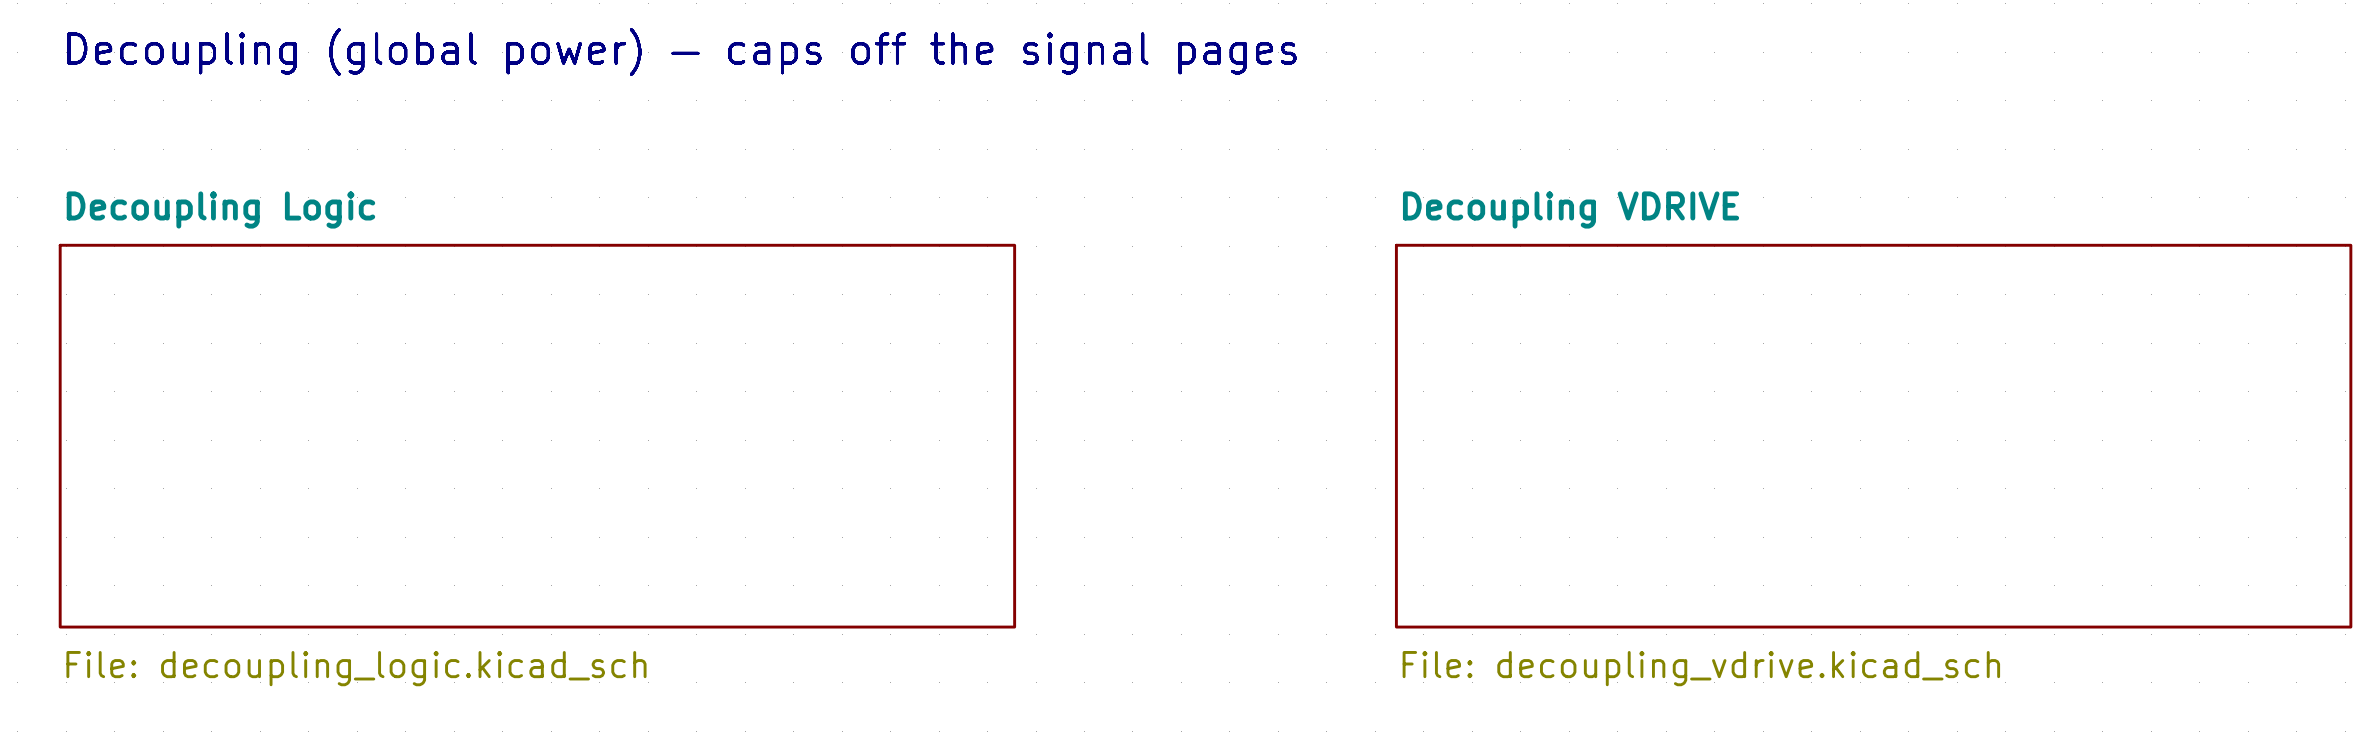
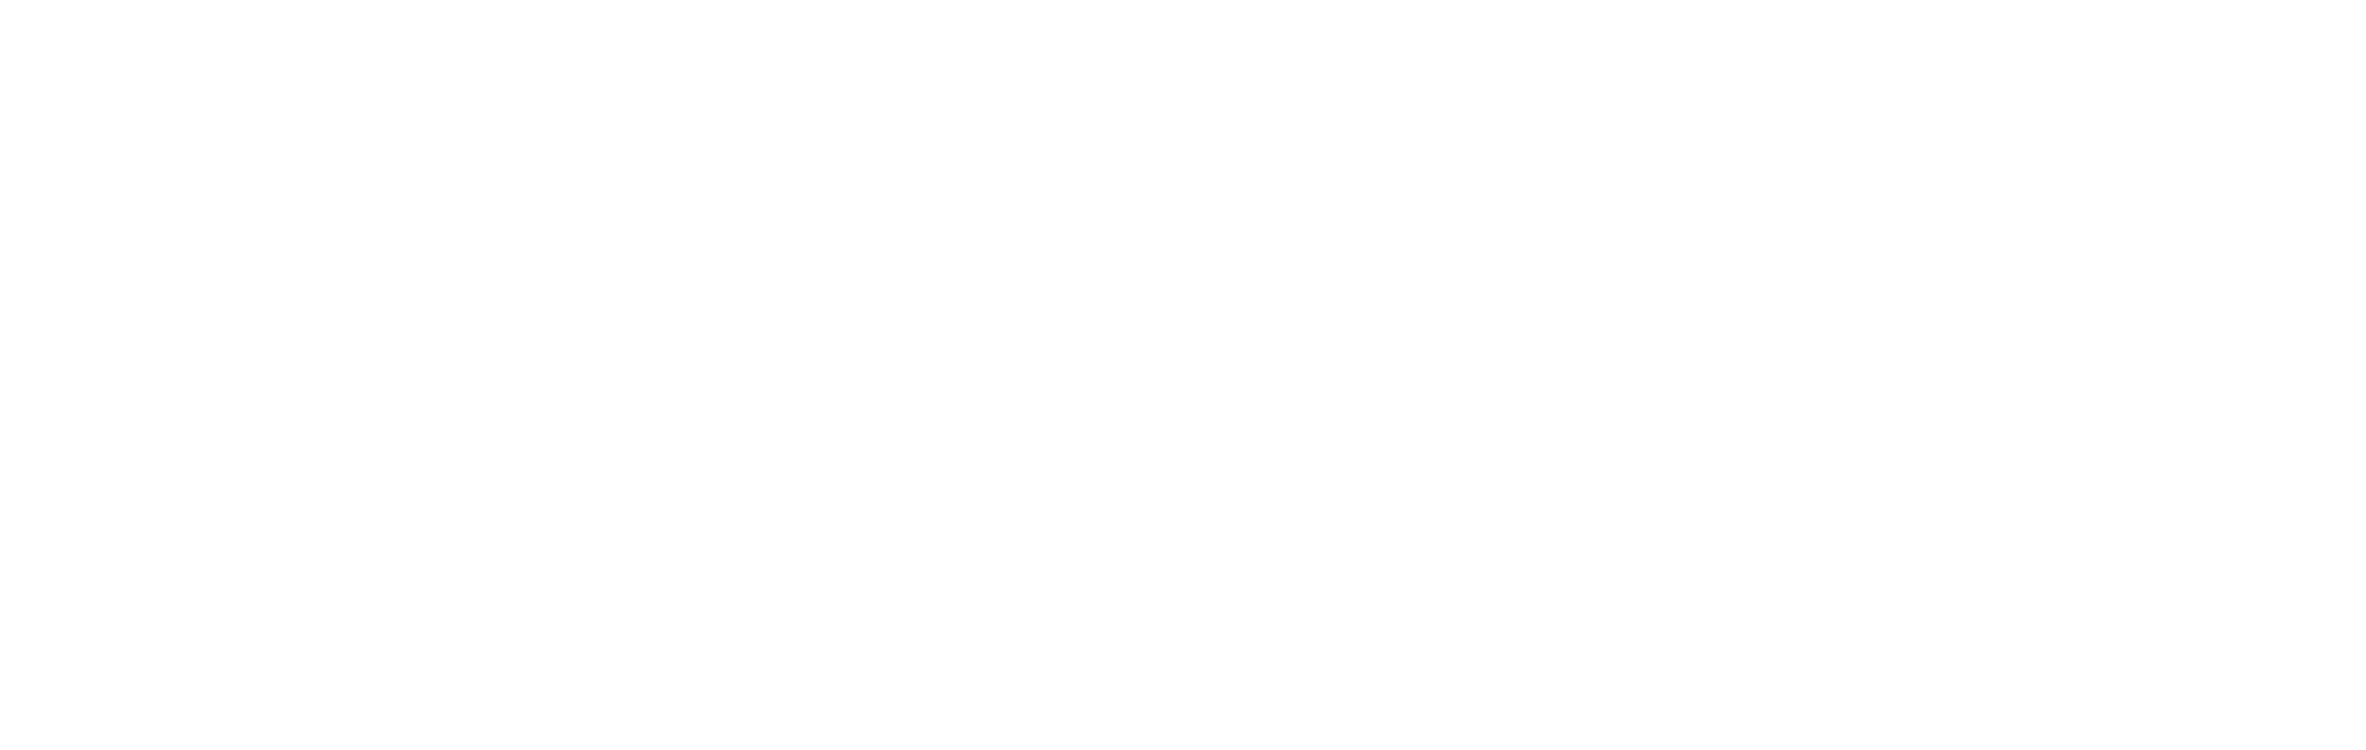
text: Decoupling (global power) — caps off the signal pages (682, 51) -> none
sheet Decoupling Logic: File: decoupling_logic.kicad_sch (537, 436) -> none
sheet Decoupling VDRIVE: File: decoupling_vdrive.kicad_sch (1873, 436) -> none

